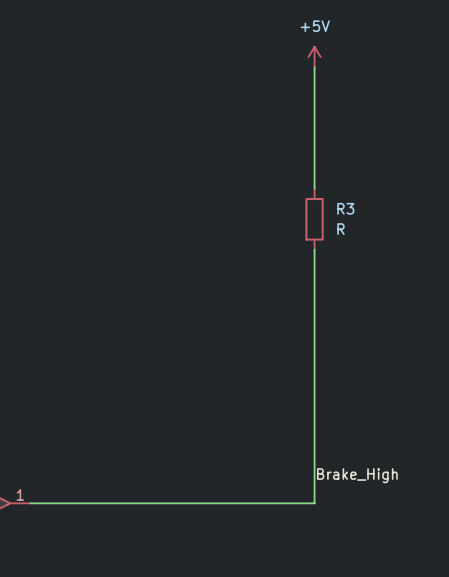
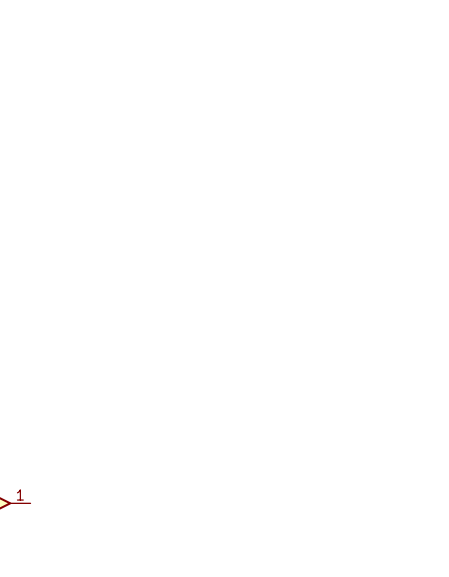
power symbol: +5V (314, 56) -> none
wire: (314, 67) (314, 188) -> none
R3: R (314, 219) -> none
wire: (314, 249) (314, 503) (30, 503) -> none
label: Brake_High (357, 475) -> none

